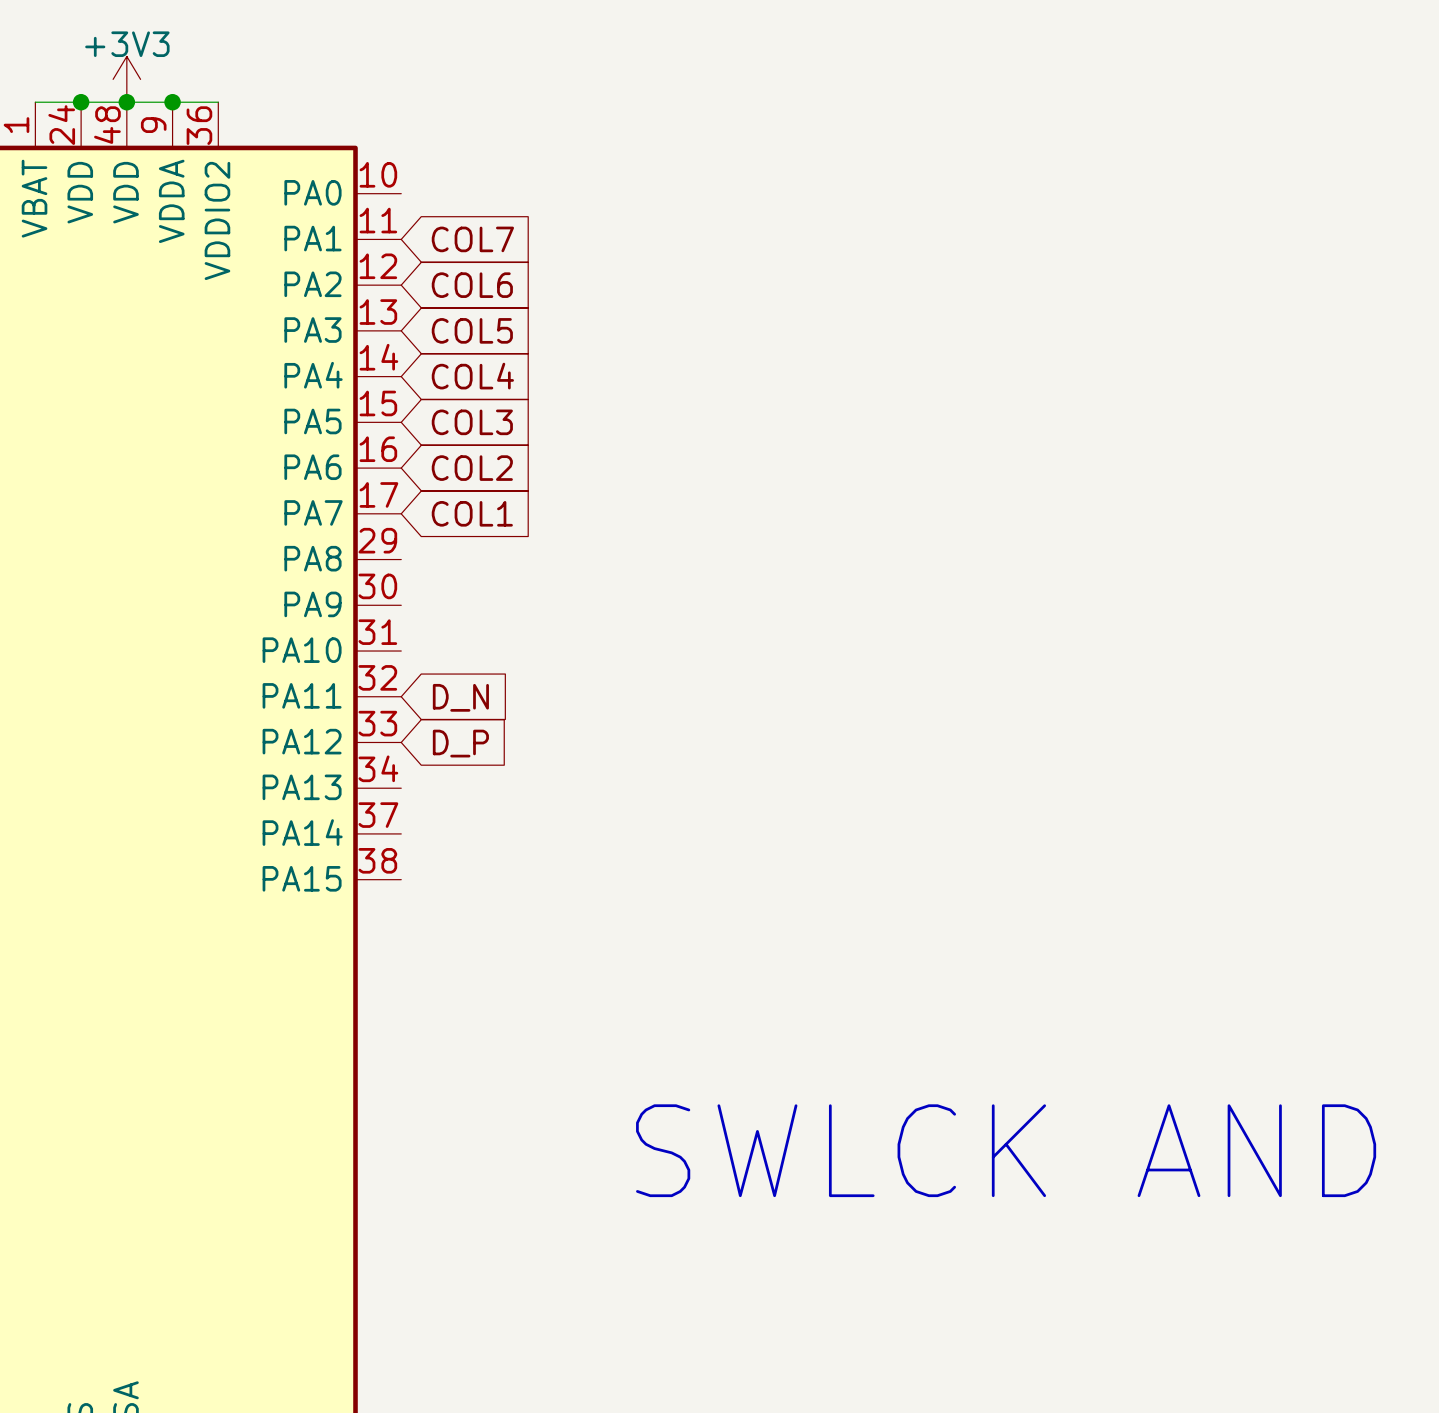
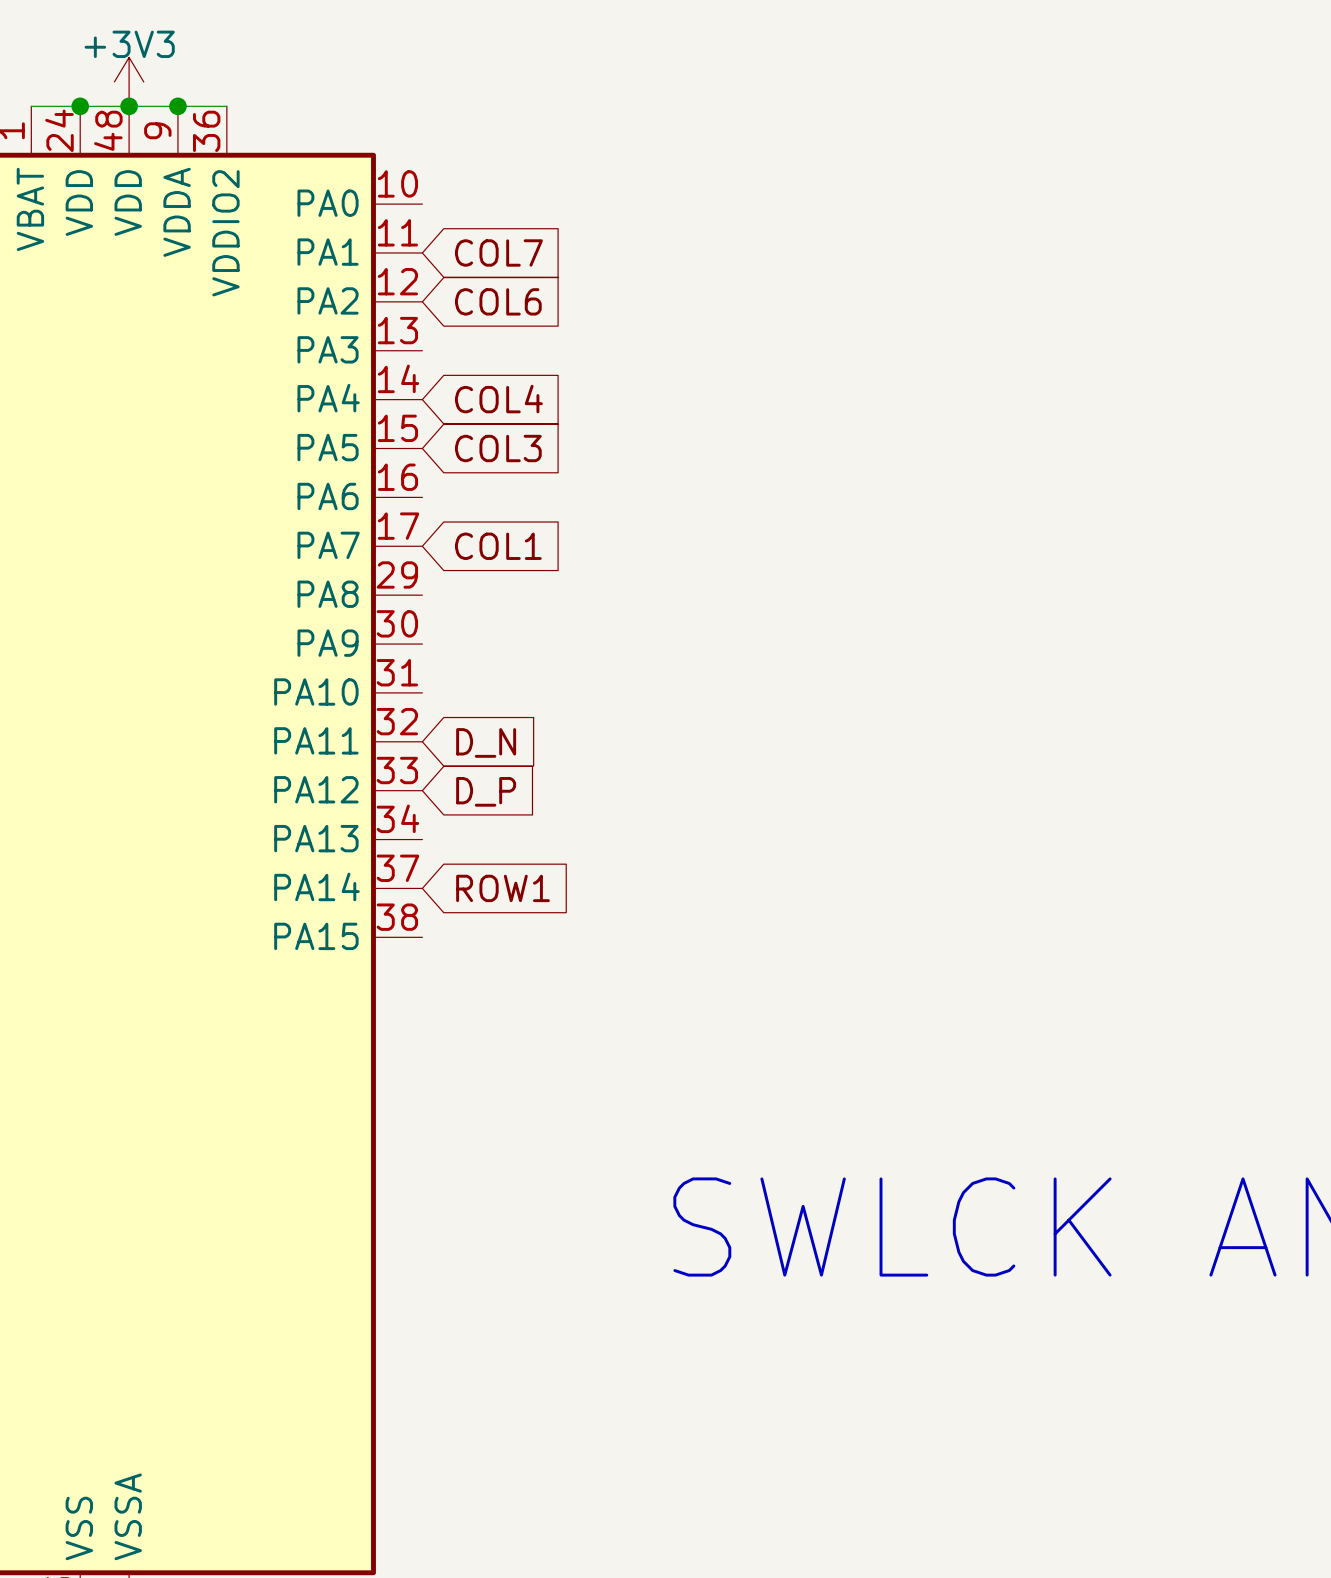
global label: COL5 (472, 330) -> none
global label: COL2 (472, 468) -> none
global label: none -> ROW1 (503, 888)

